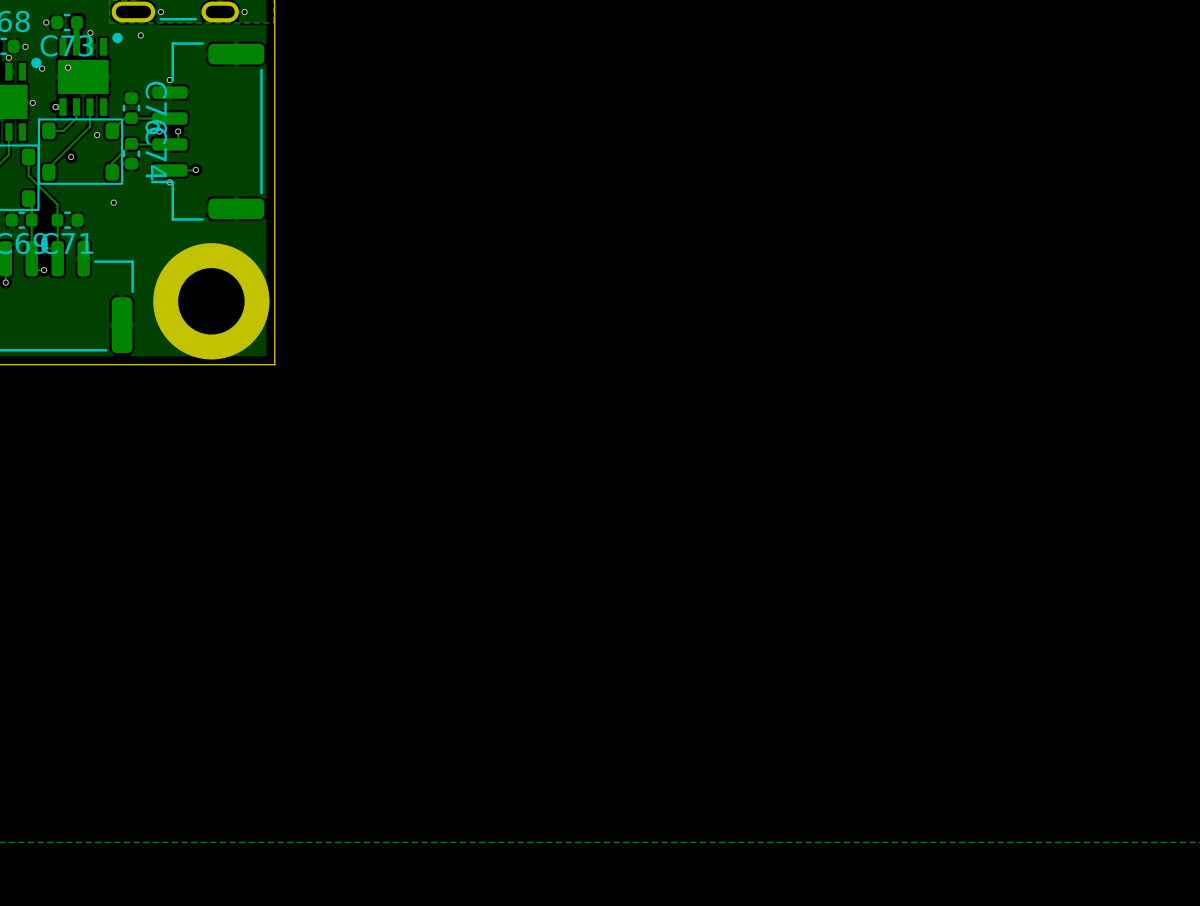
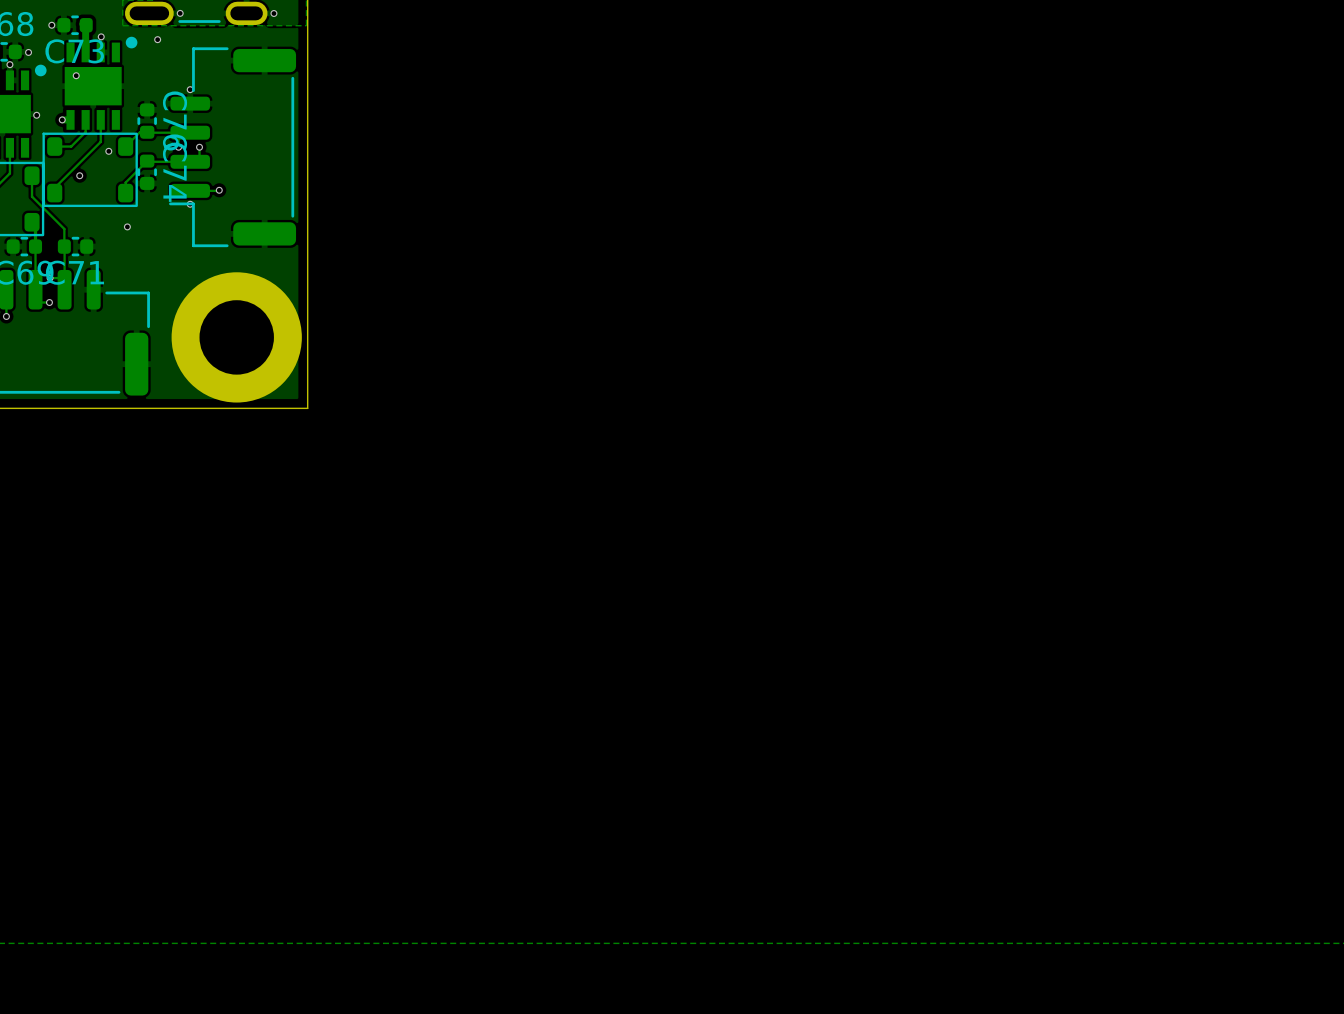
via: (42, 68) -> none

